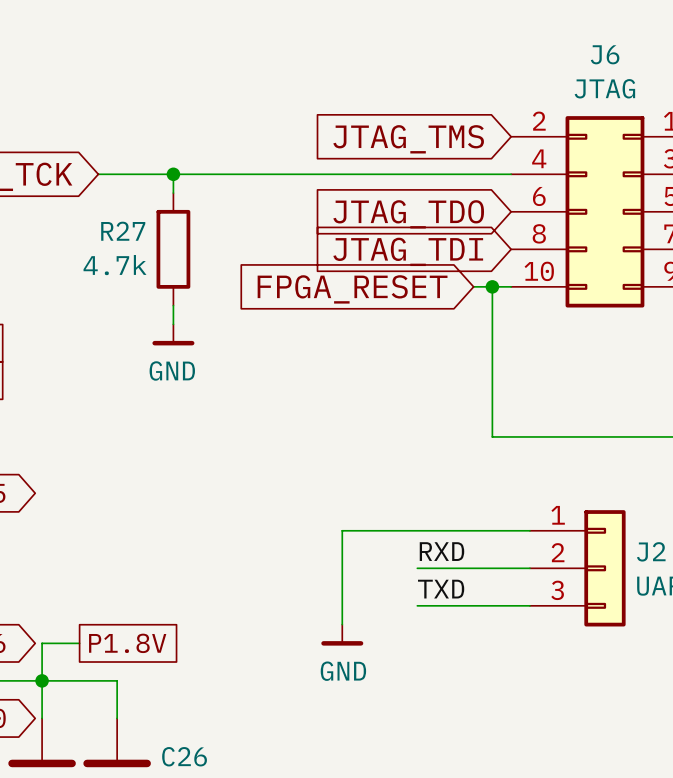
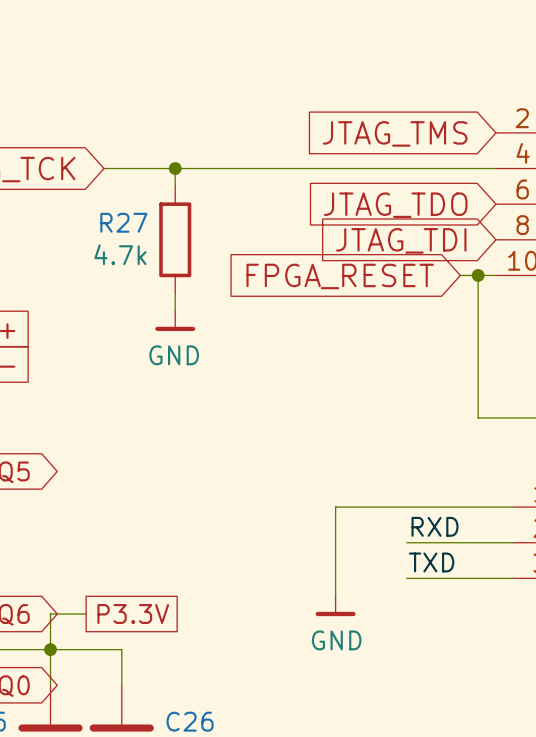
global label: P1.8V (127, 643) -> P3.3V (133, 614)

